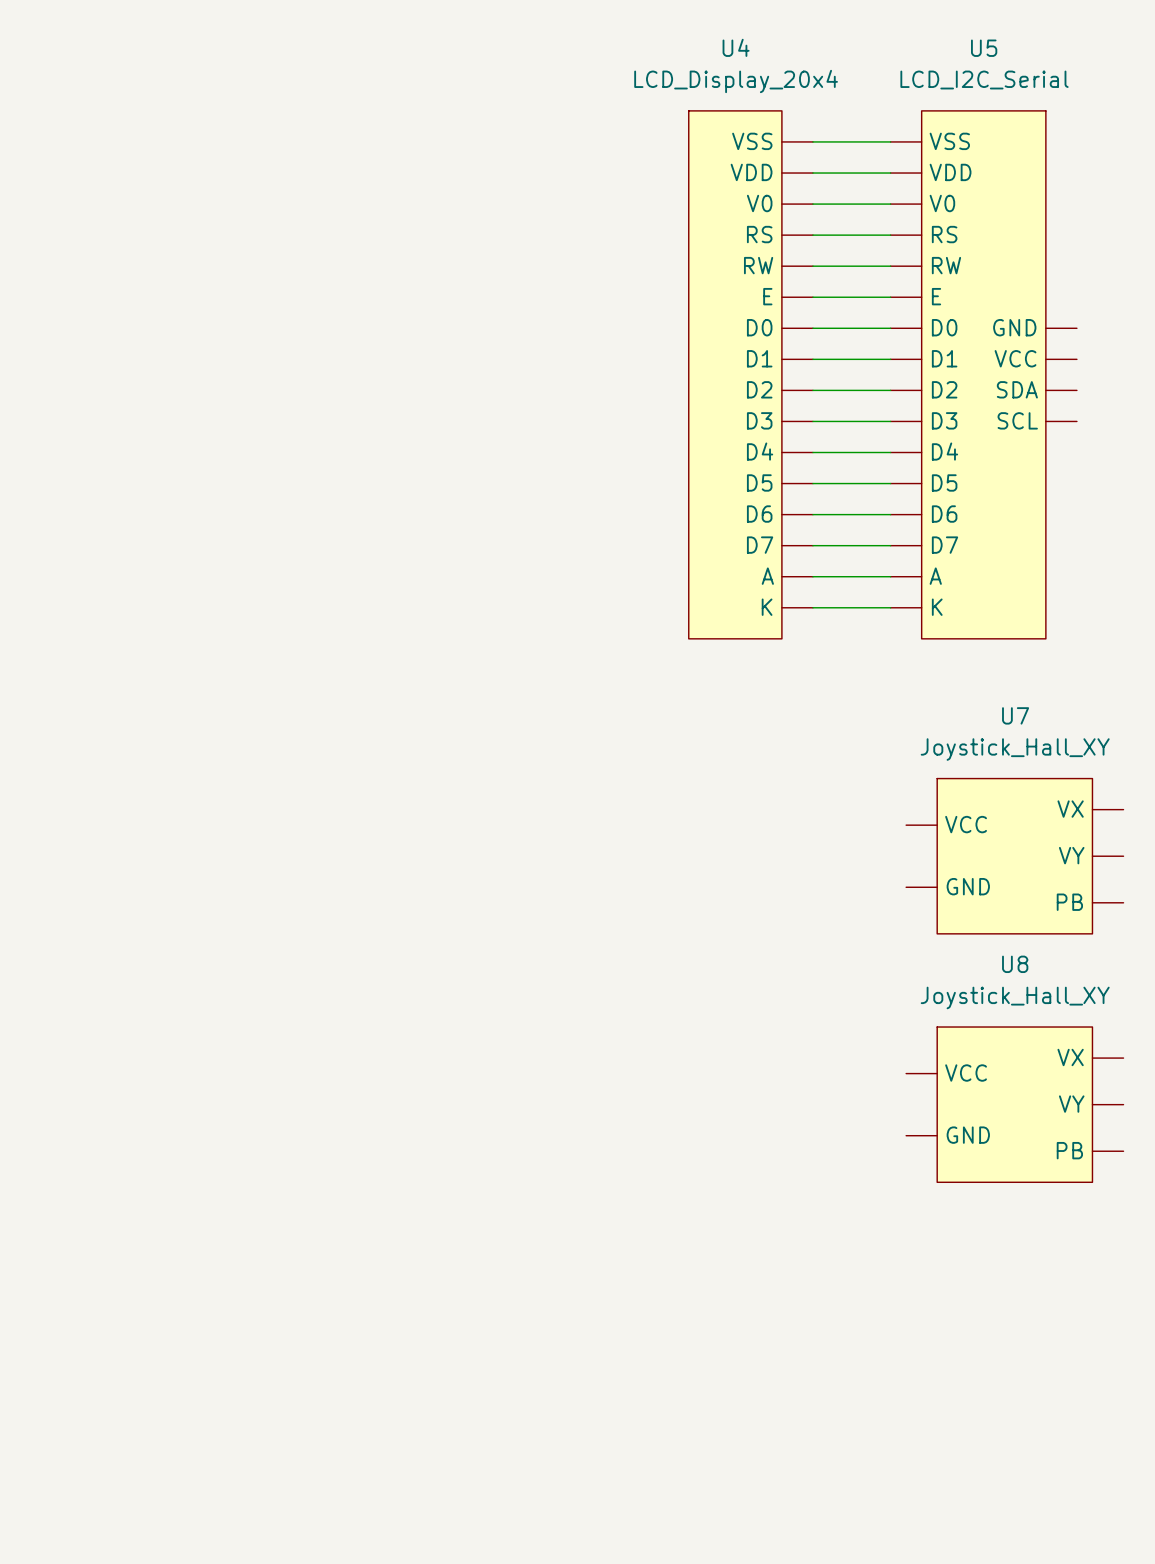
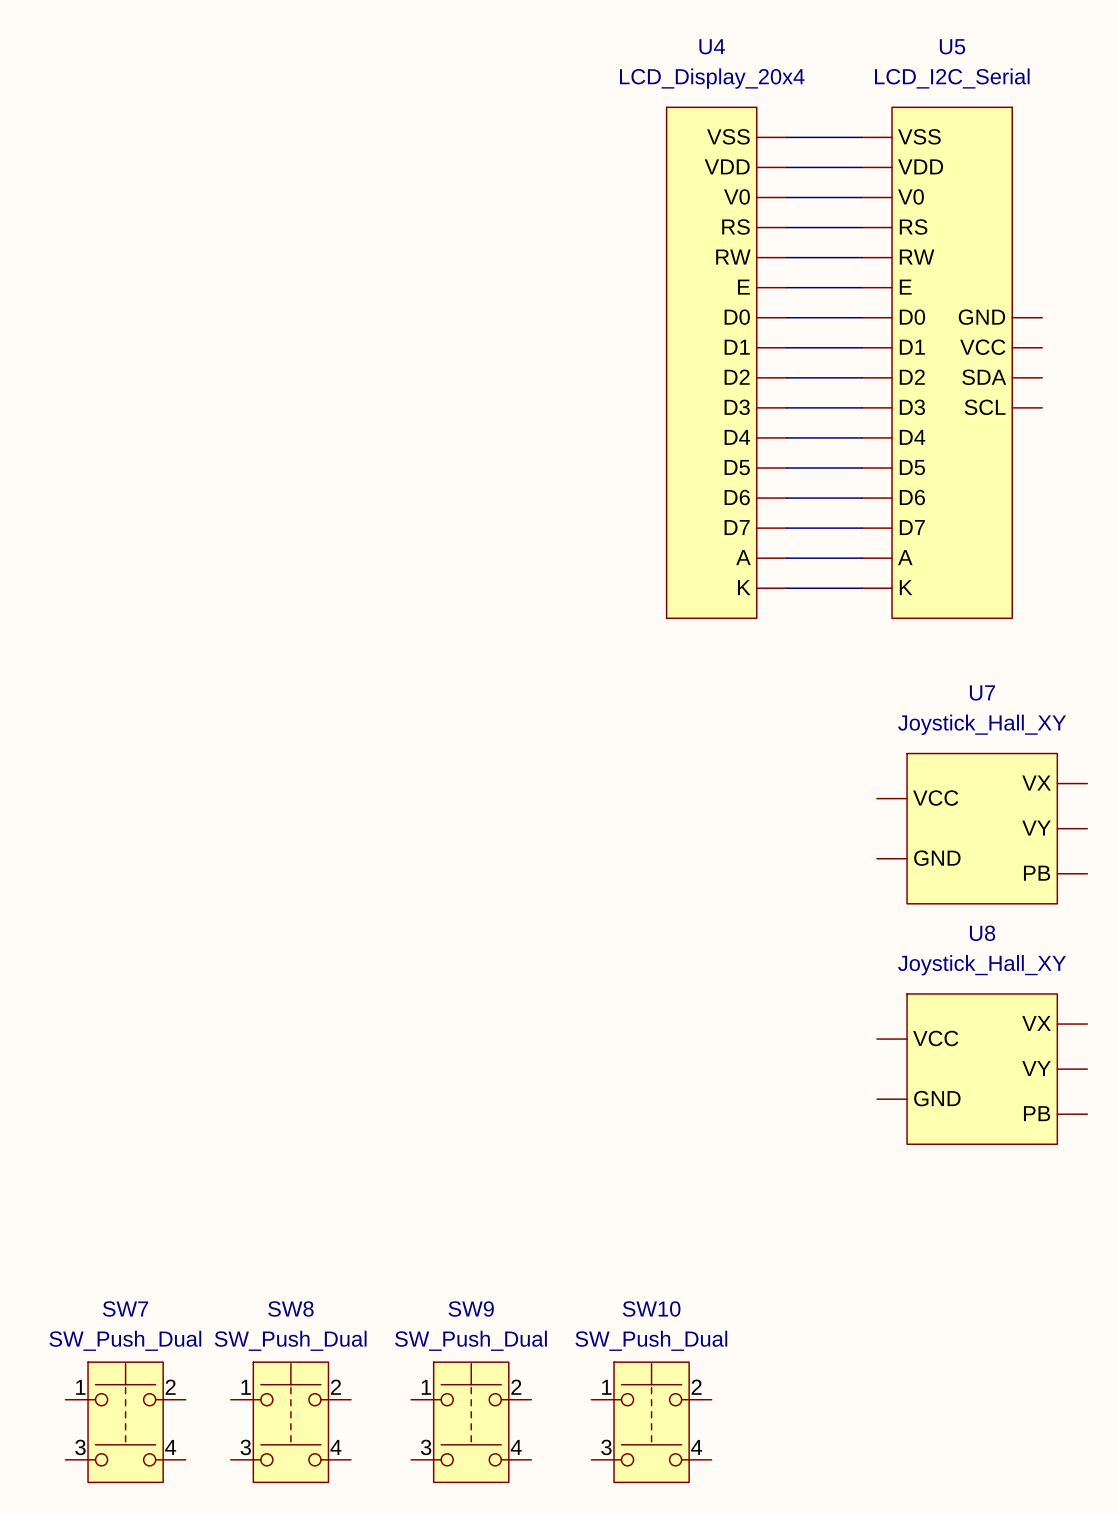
SW7: none -> SW_Push_Dual (125, 1422)
SW8: none -> SW_Push_Dual (290, 1422)
SW9: none -> SW_Push_Dual (471, 1422)
SW10: none -> SW_Push_Dual (651, 1422)

